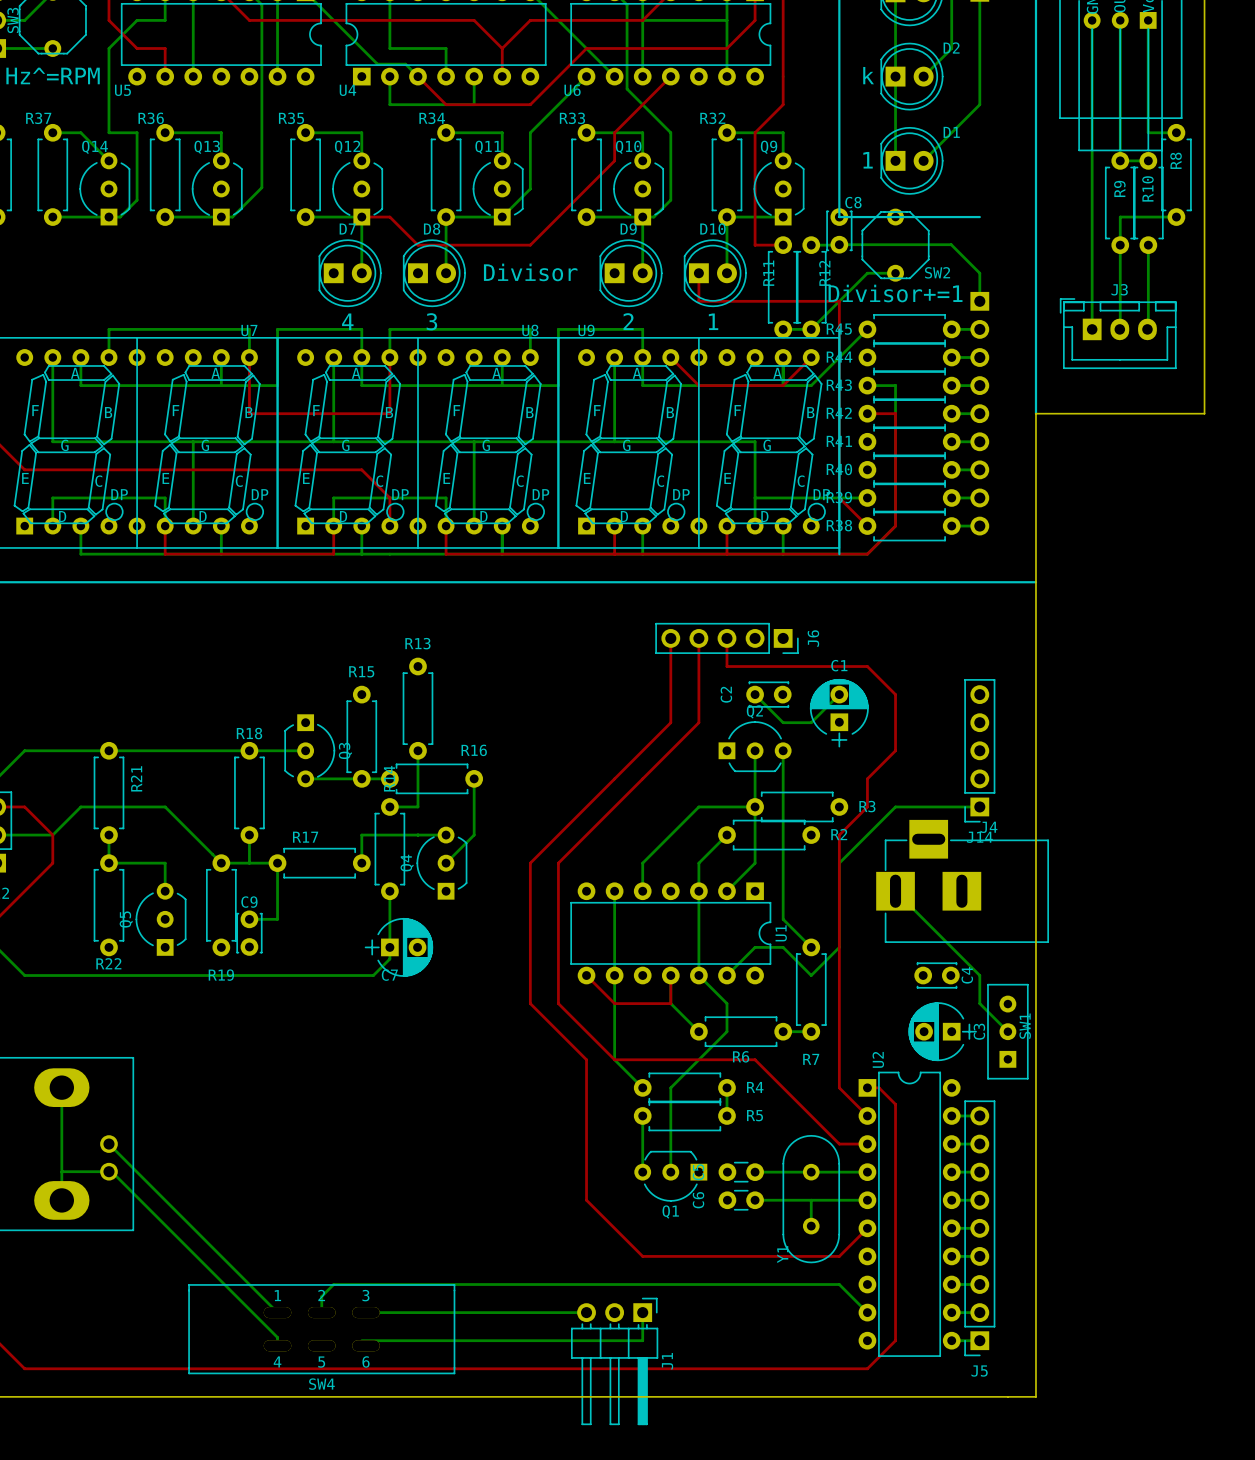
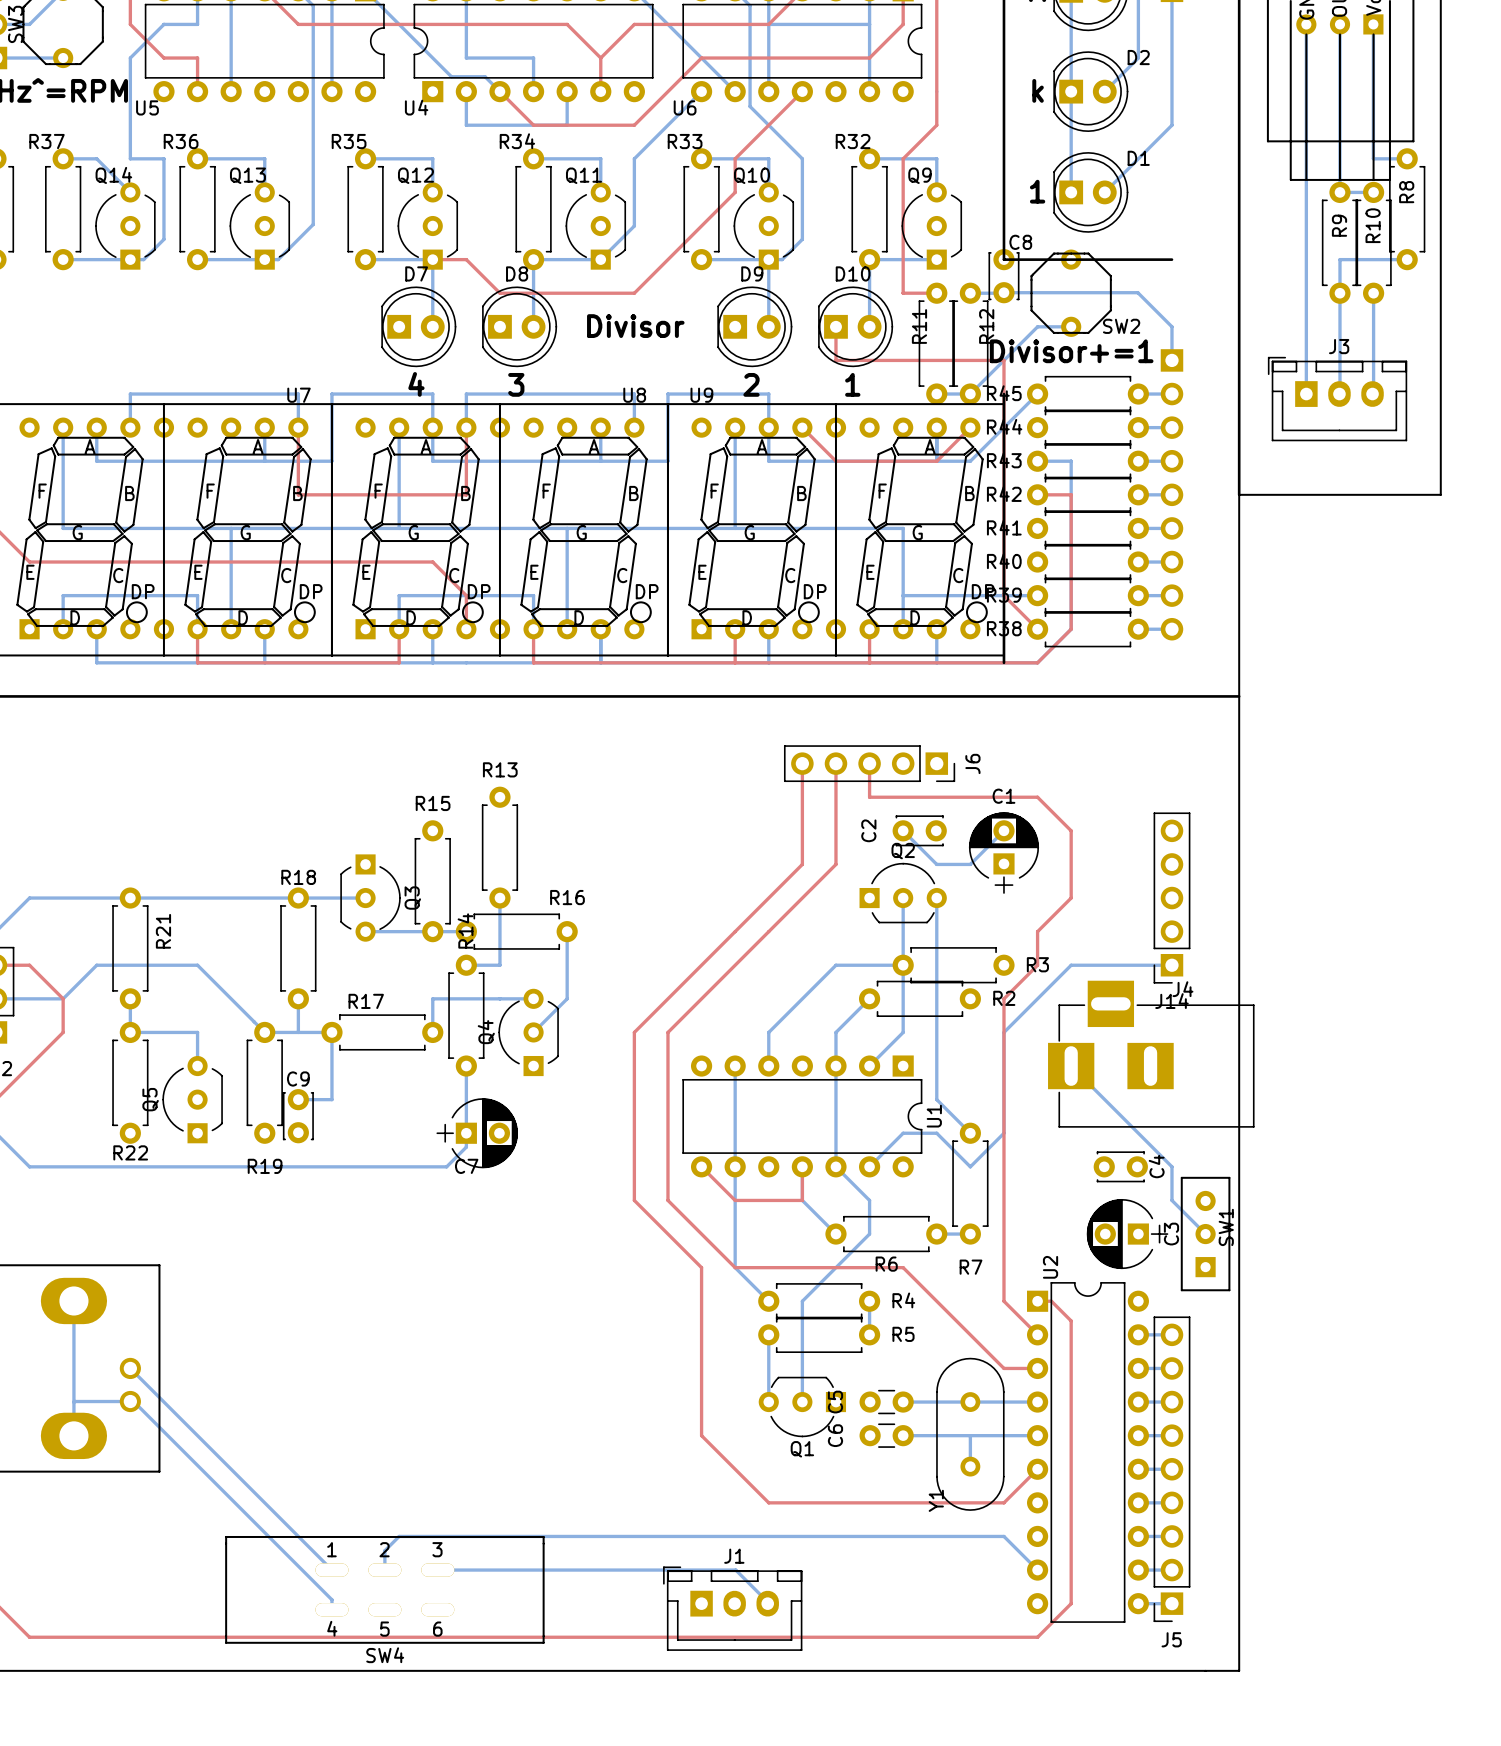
J1 footprint: [571, 1297, 659, 1425] -> [663, 1566, 803, 1651]
bottom track: none -> (701, 1570) (735, 1570) (767, 1603)
bottom track: (642, 1312) (642, 1340) (361, 1340) -> none
J1 name position: J1 (667, 1361) -> J1 (734, 1556)

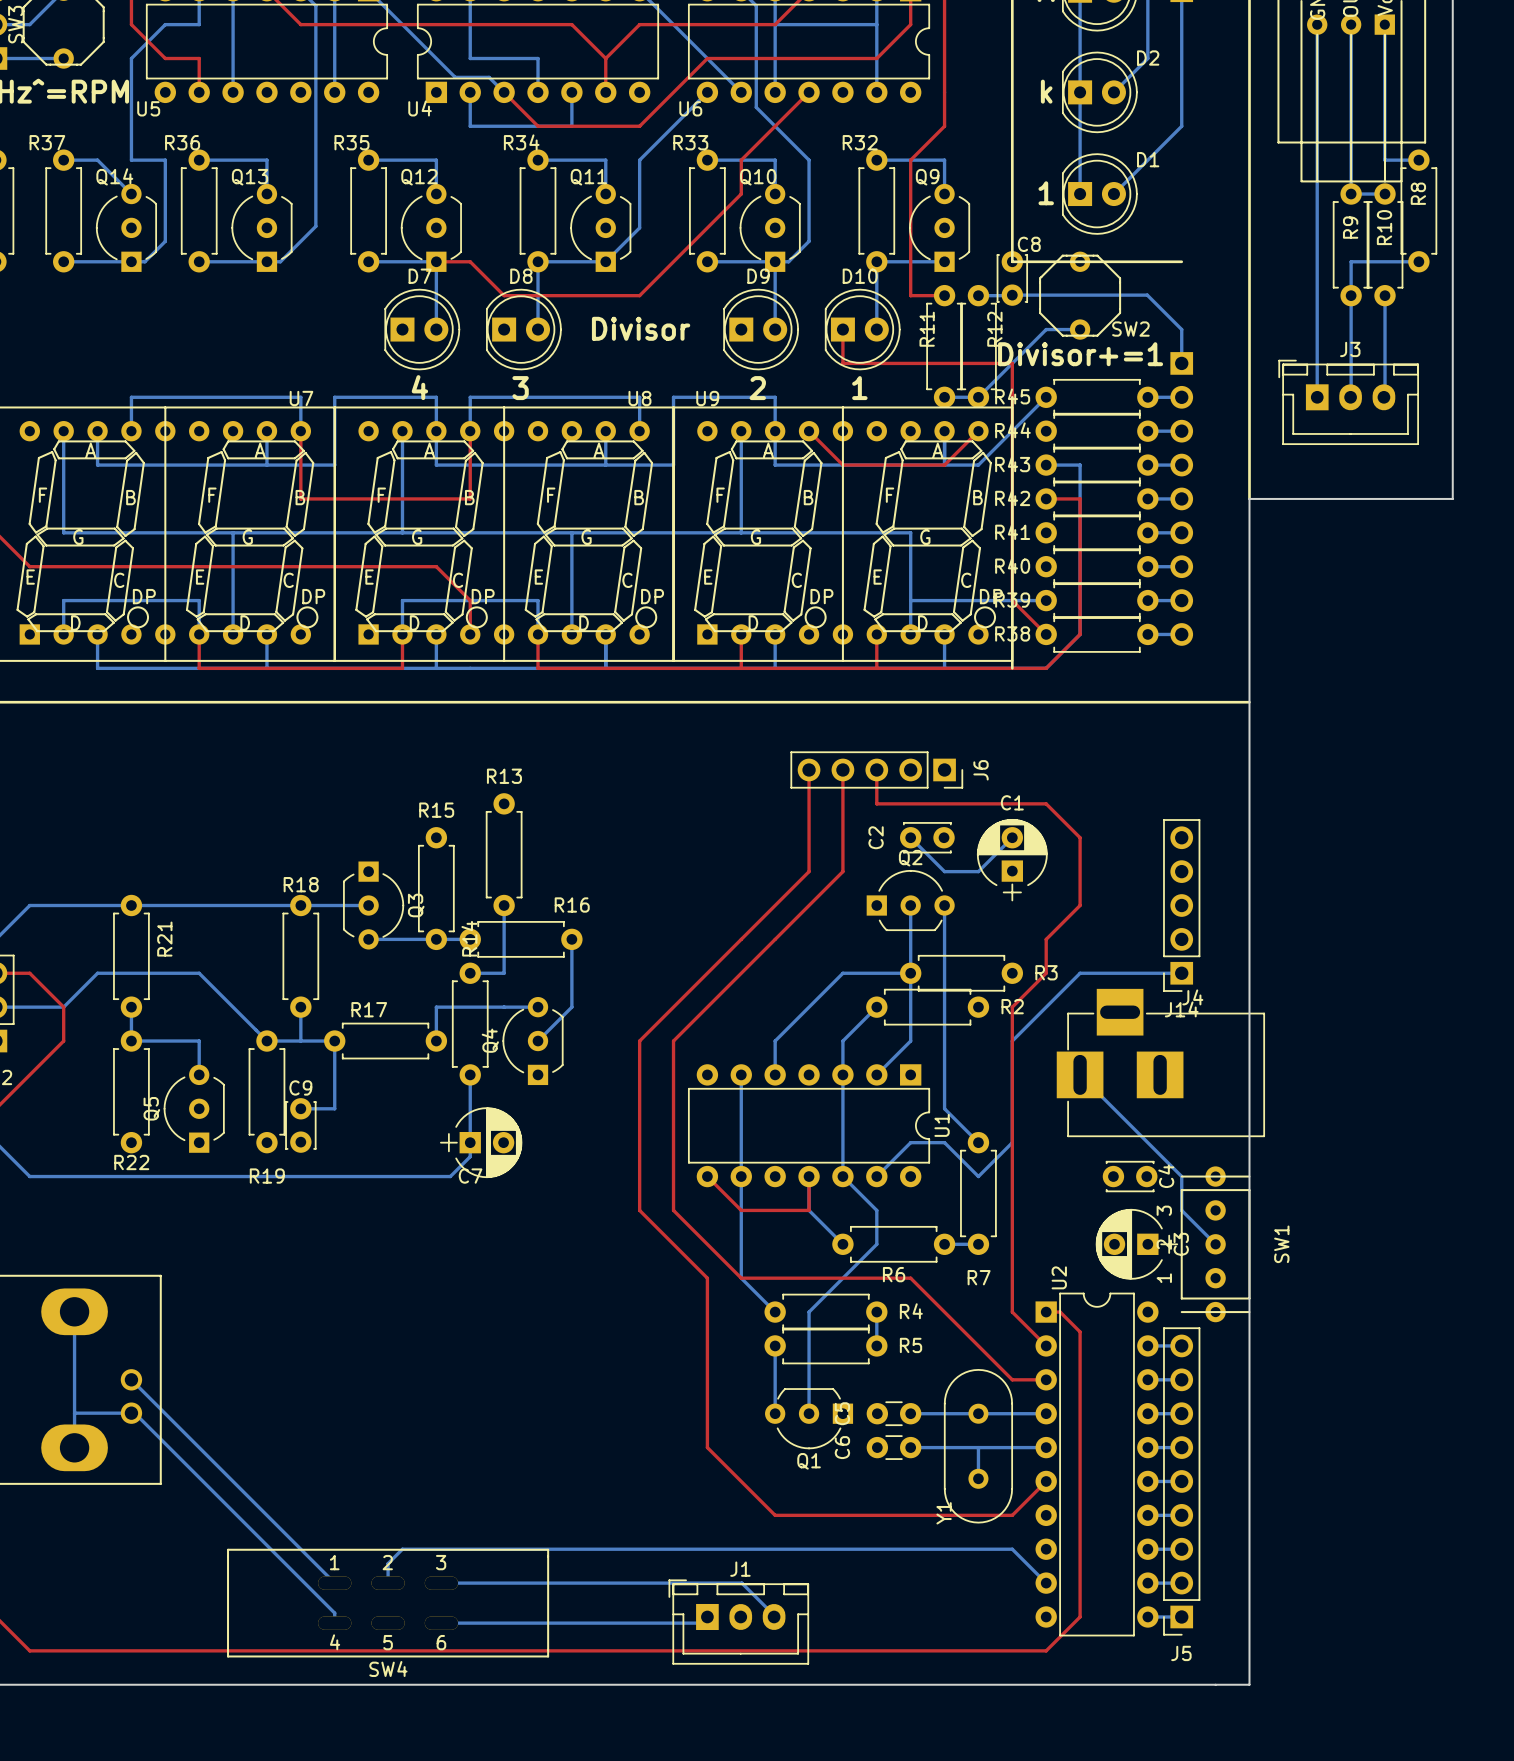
SW1 footprint: [1180, 1176, 1231, 1292] -> [1180, 1166, 1251, 1323]
SW1 name position: SW1 (1226, 1227) -> SW1 (1281, 1244)
bottom track: none -> (707, 1616) (701, 1623) (441, 1623)

